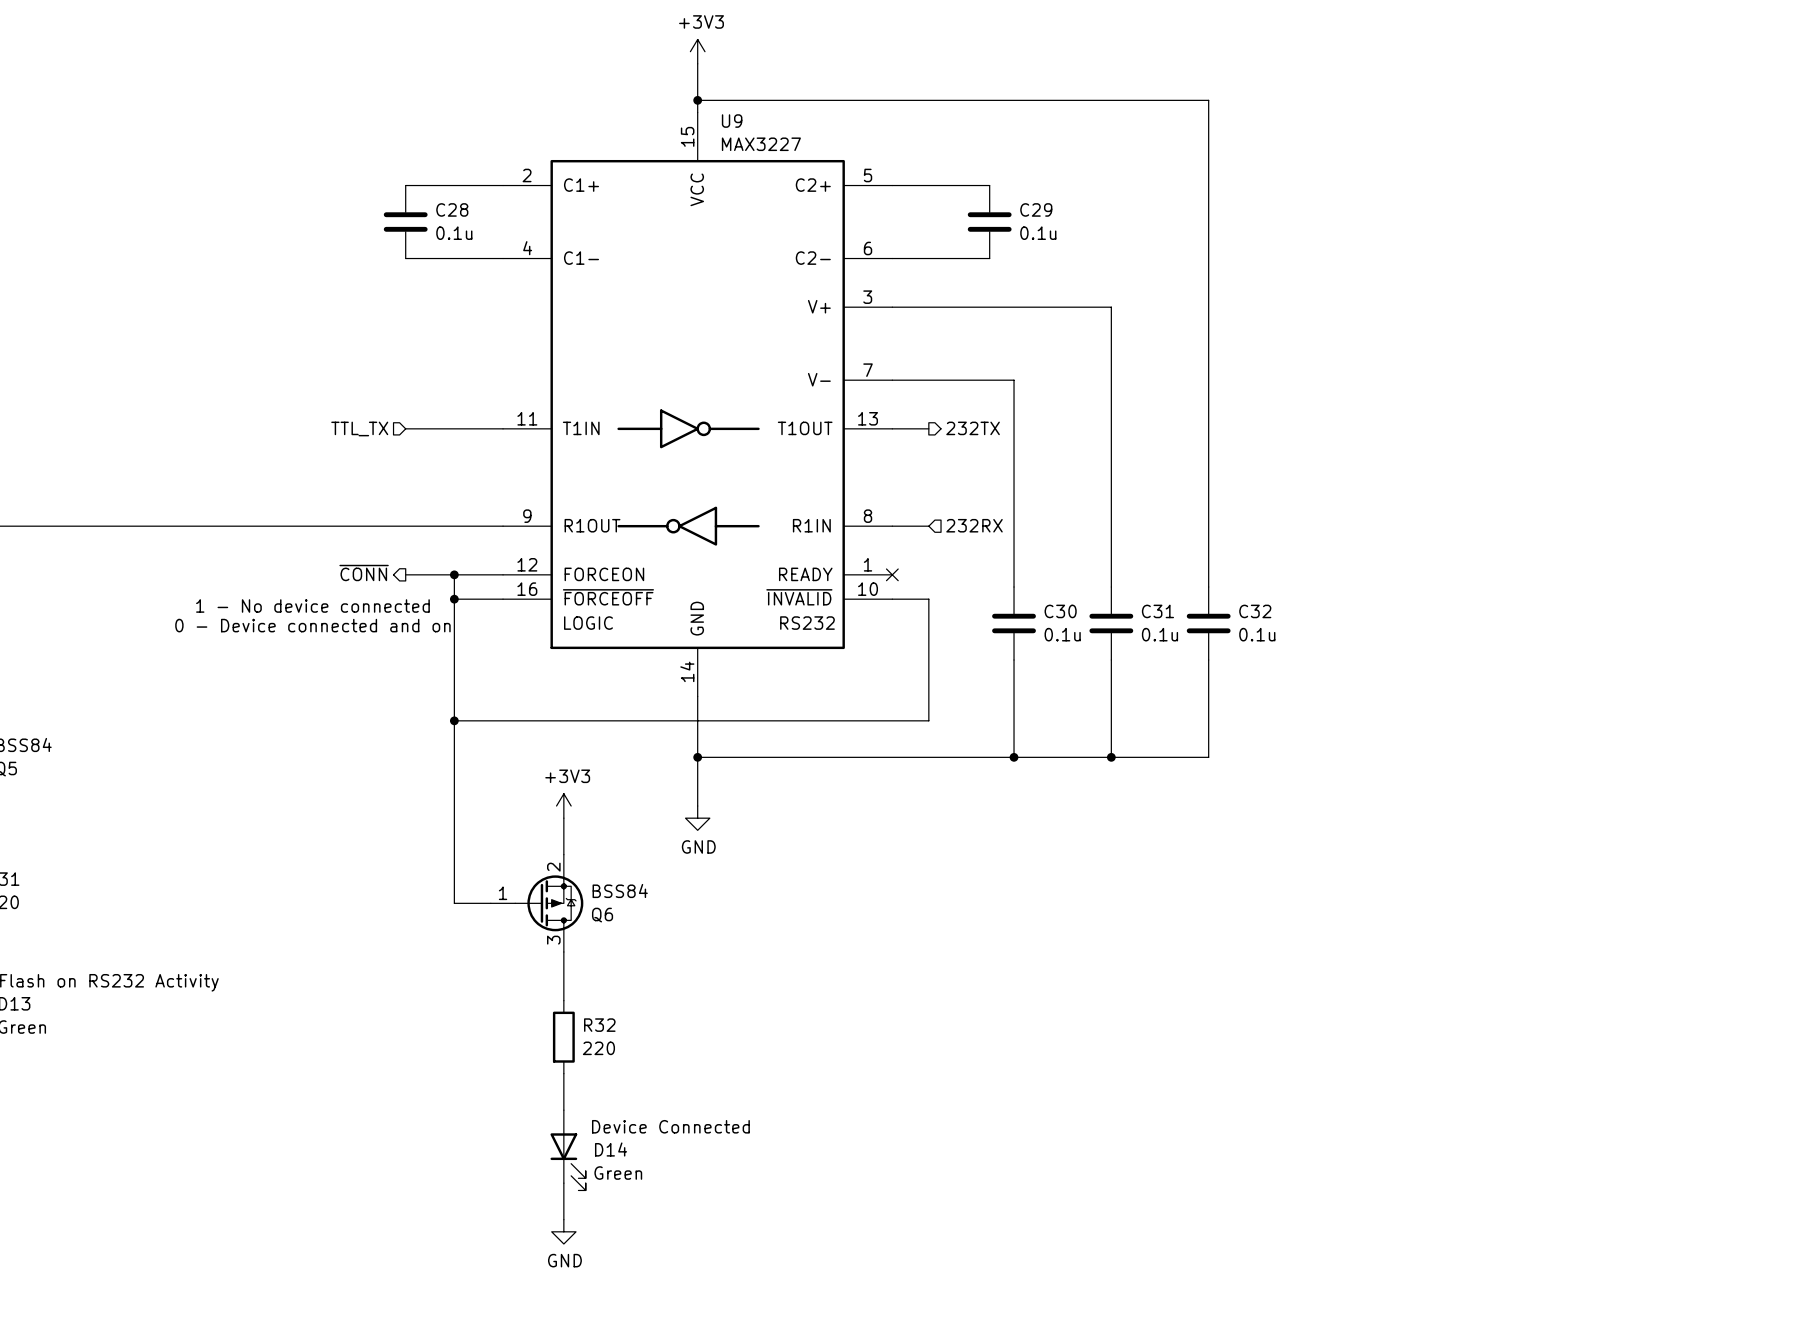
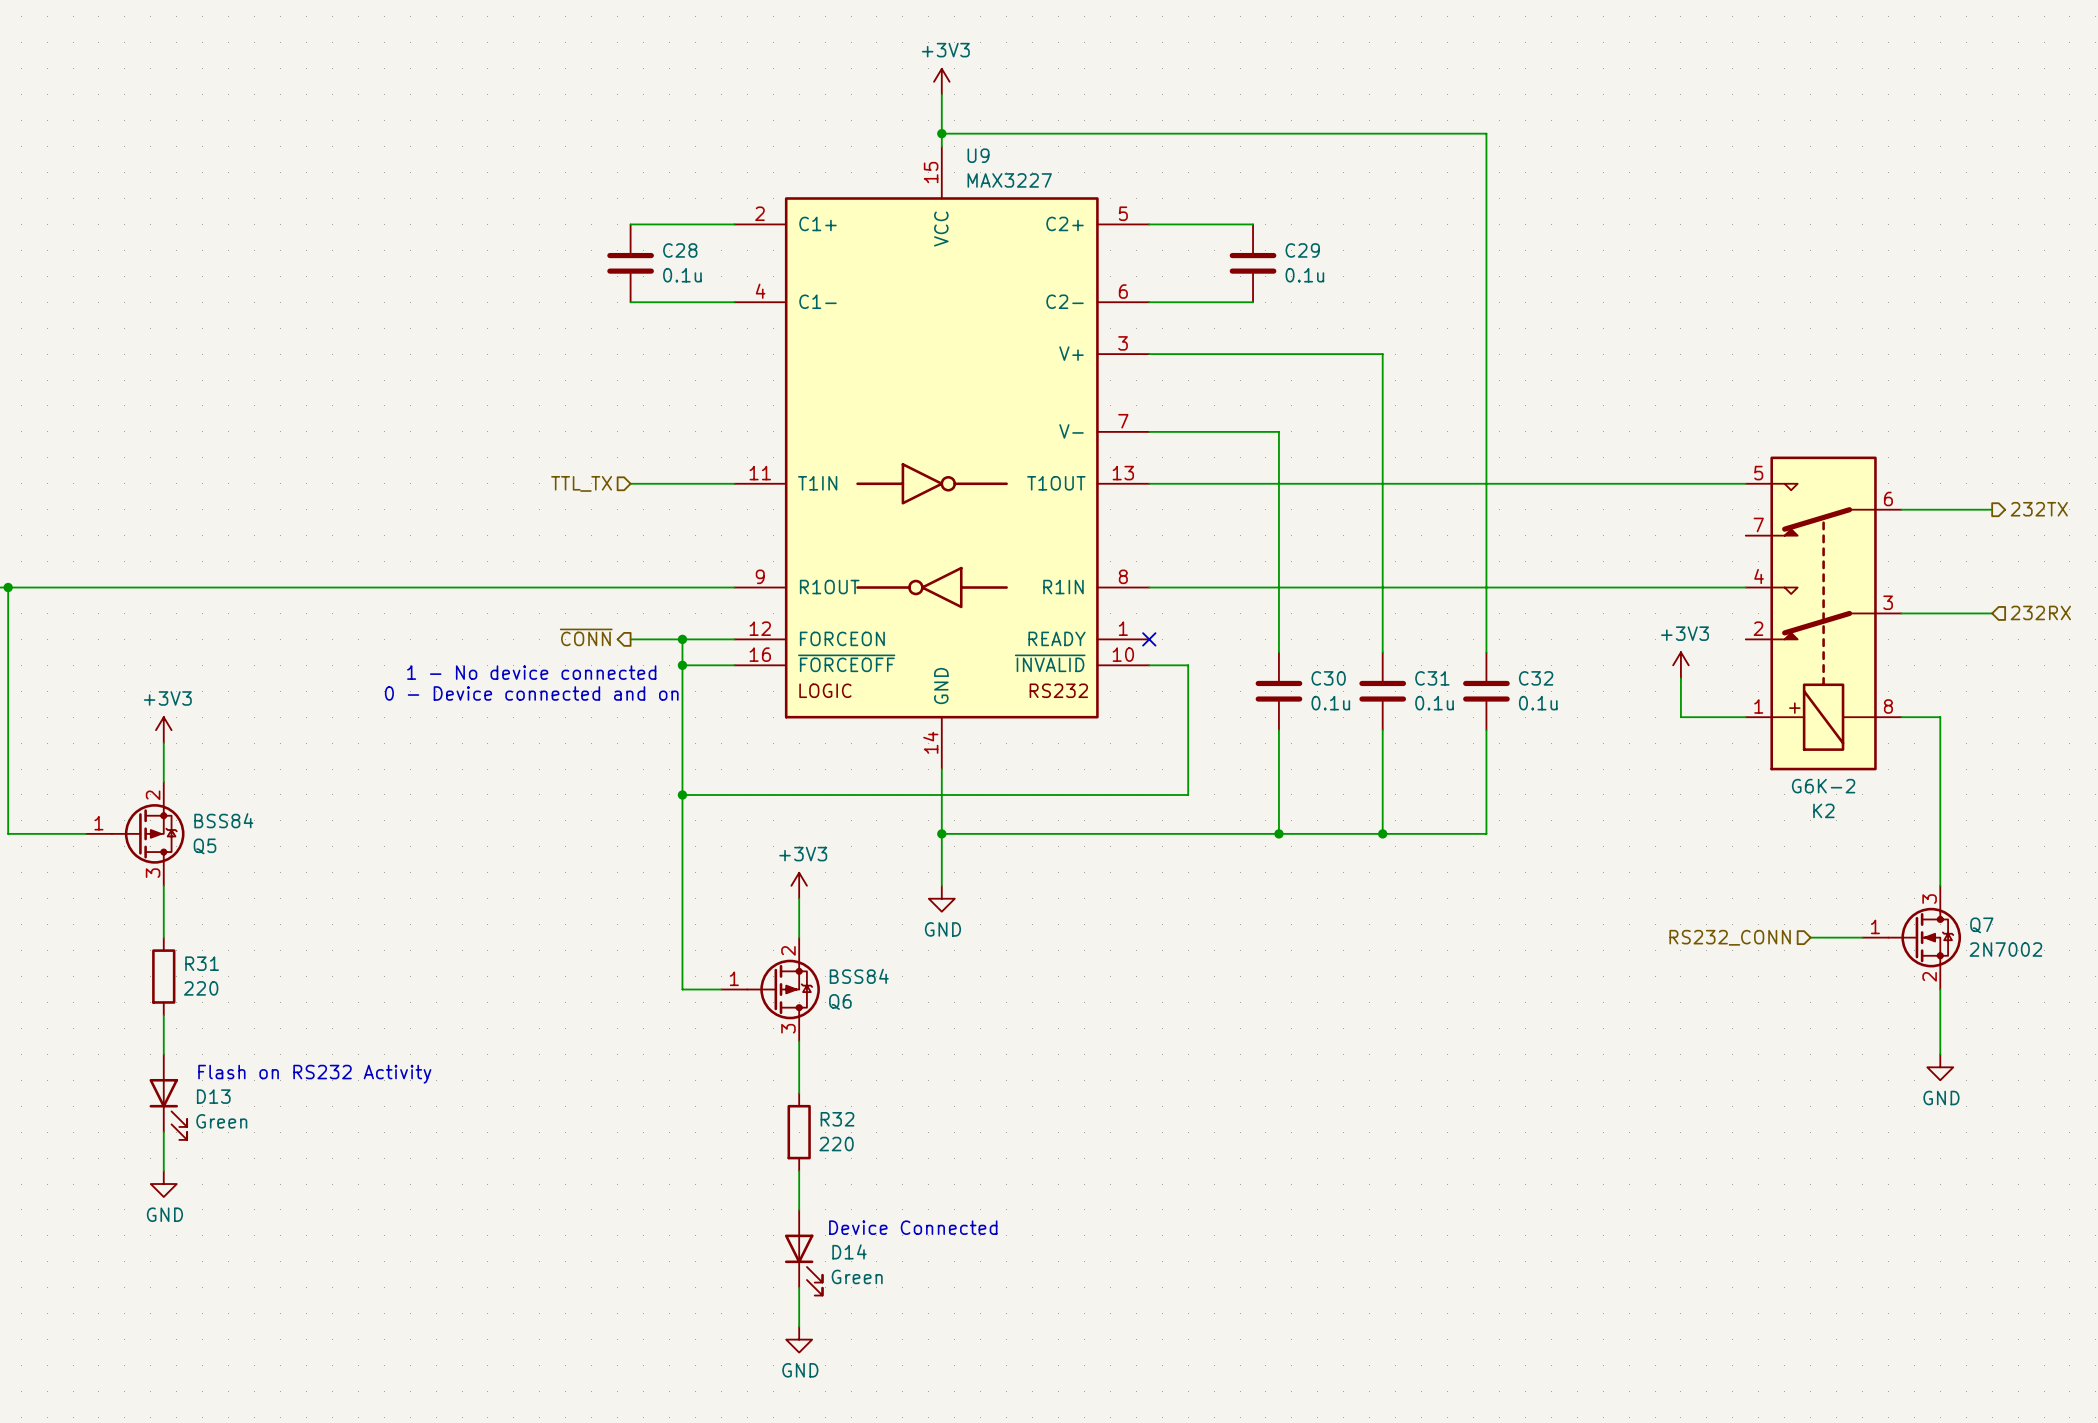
wire: none -> (1188, 483) (1745, 483)
hierarchical label: 232TX (973, 428) -> none
hierarchical label: none -> 232TX (2039, 509)
wire: none -> (1901, 509) (1992, 509)
hierarchical label: 232RX (974, 525) -> none
wire: none -> (1188, 587) (1745, 587)
K2: none -> G6K-2 (1823, 613)
wire: none -> (1901, 613) (1992, 613)
hierarchical label: none -> 232RX (2040, 612)
power symbol: none -> +3V3 (1680, 665)
wire: none -> (1680, 678) (1680, 717) (1745, 717)
wire: none -> (1901, 717) (1940, 717) (1940, 885)
hierarchical label: none -> RS232_CONN (1730, 937)
wire: none -> (1810, 937) (1862, 937)
Q7: none -> 2N7002 (1911, 937)
wire: none -> (1940, 989) (1940, 1054)
power symbol: none -> GND (1940, 1067)

